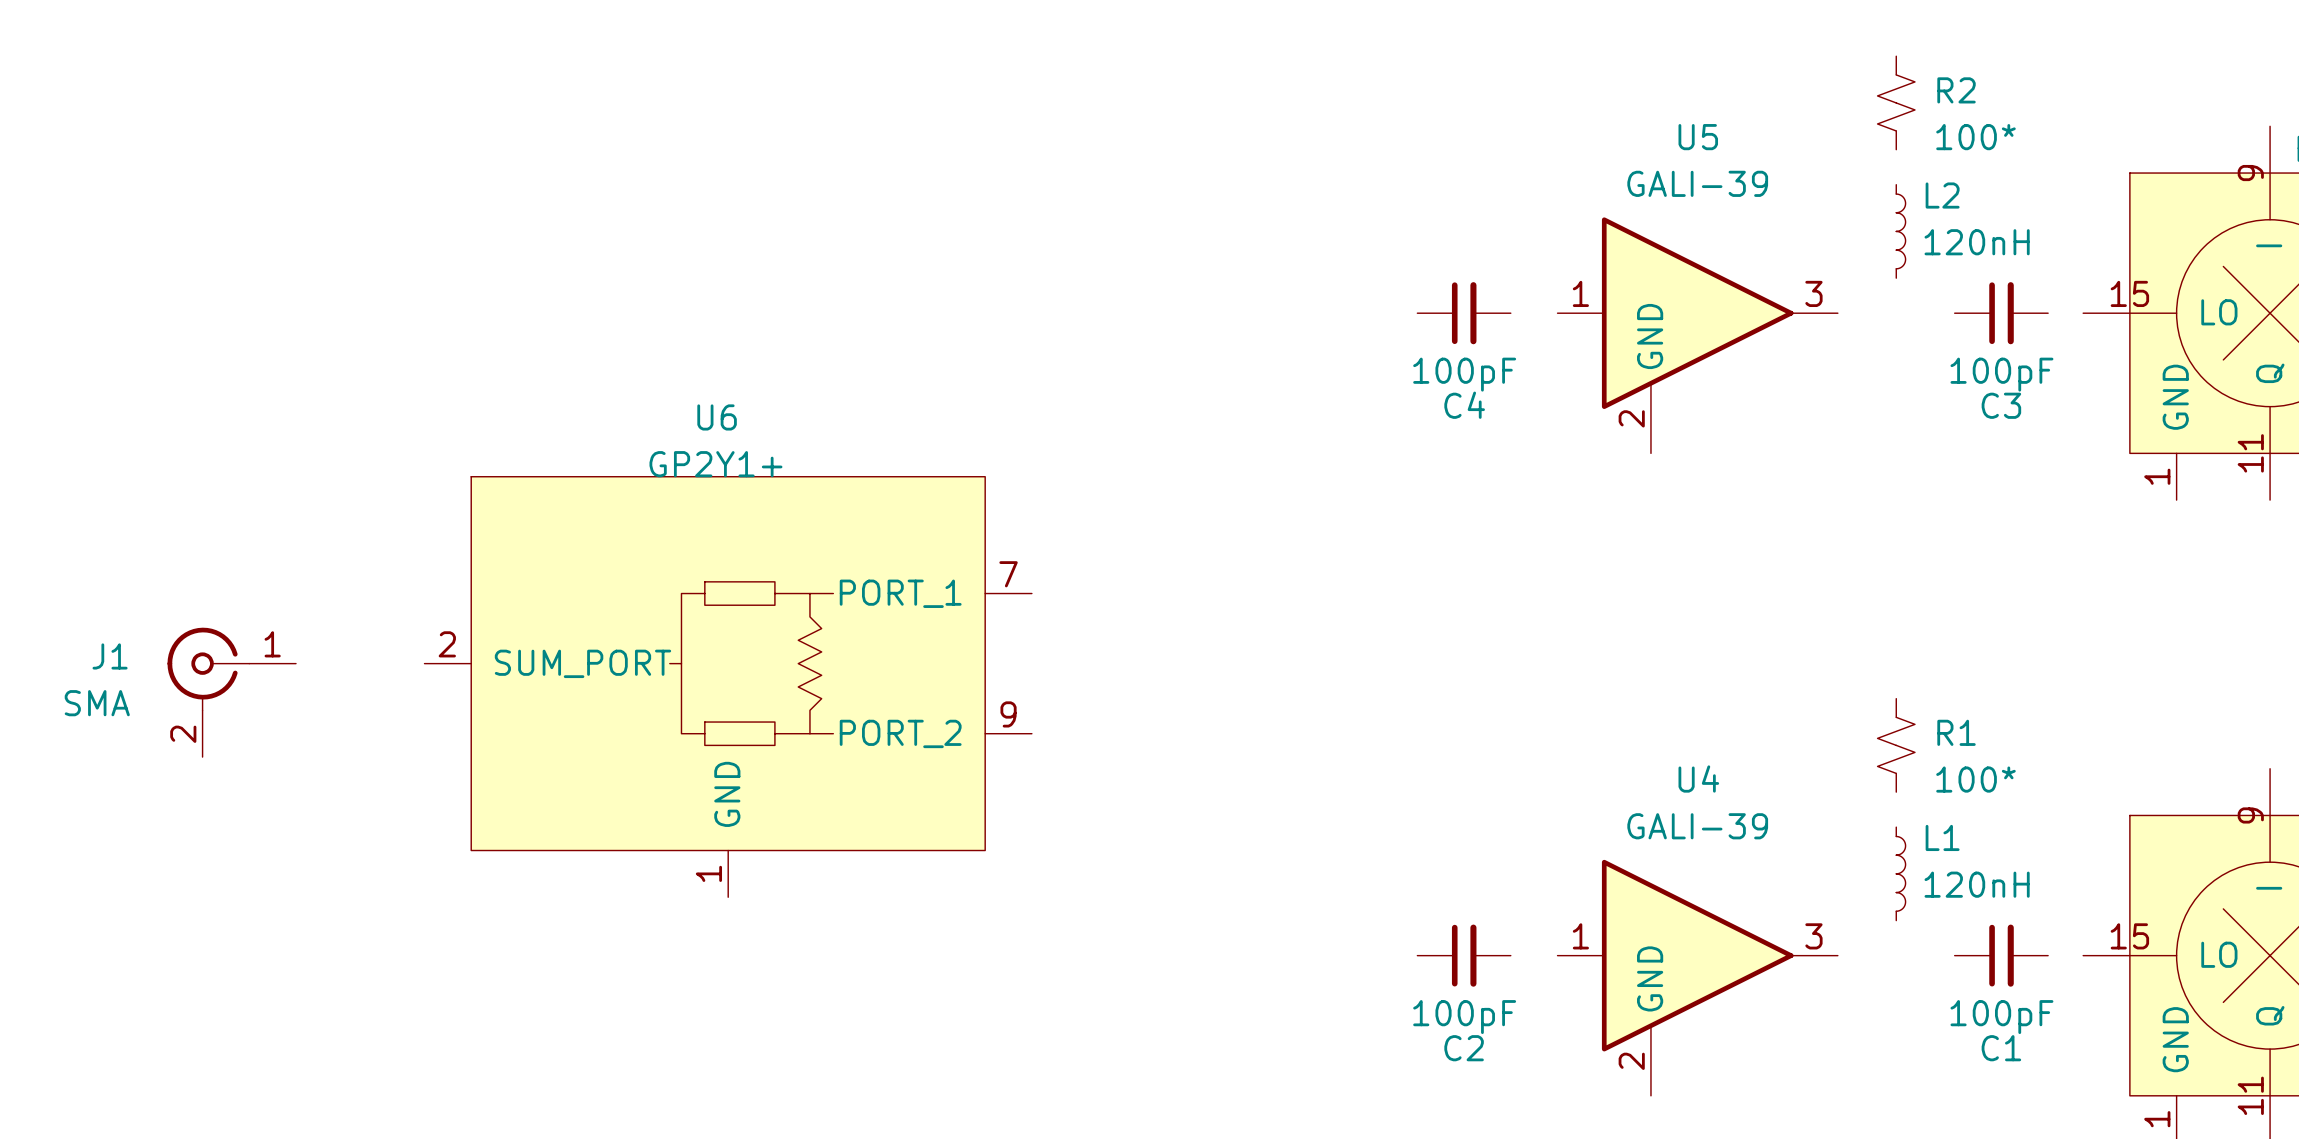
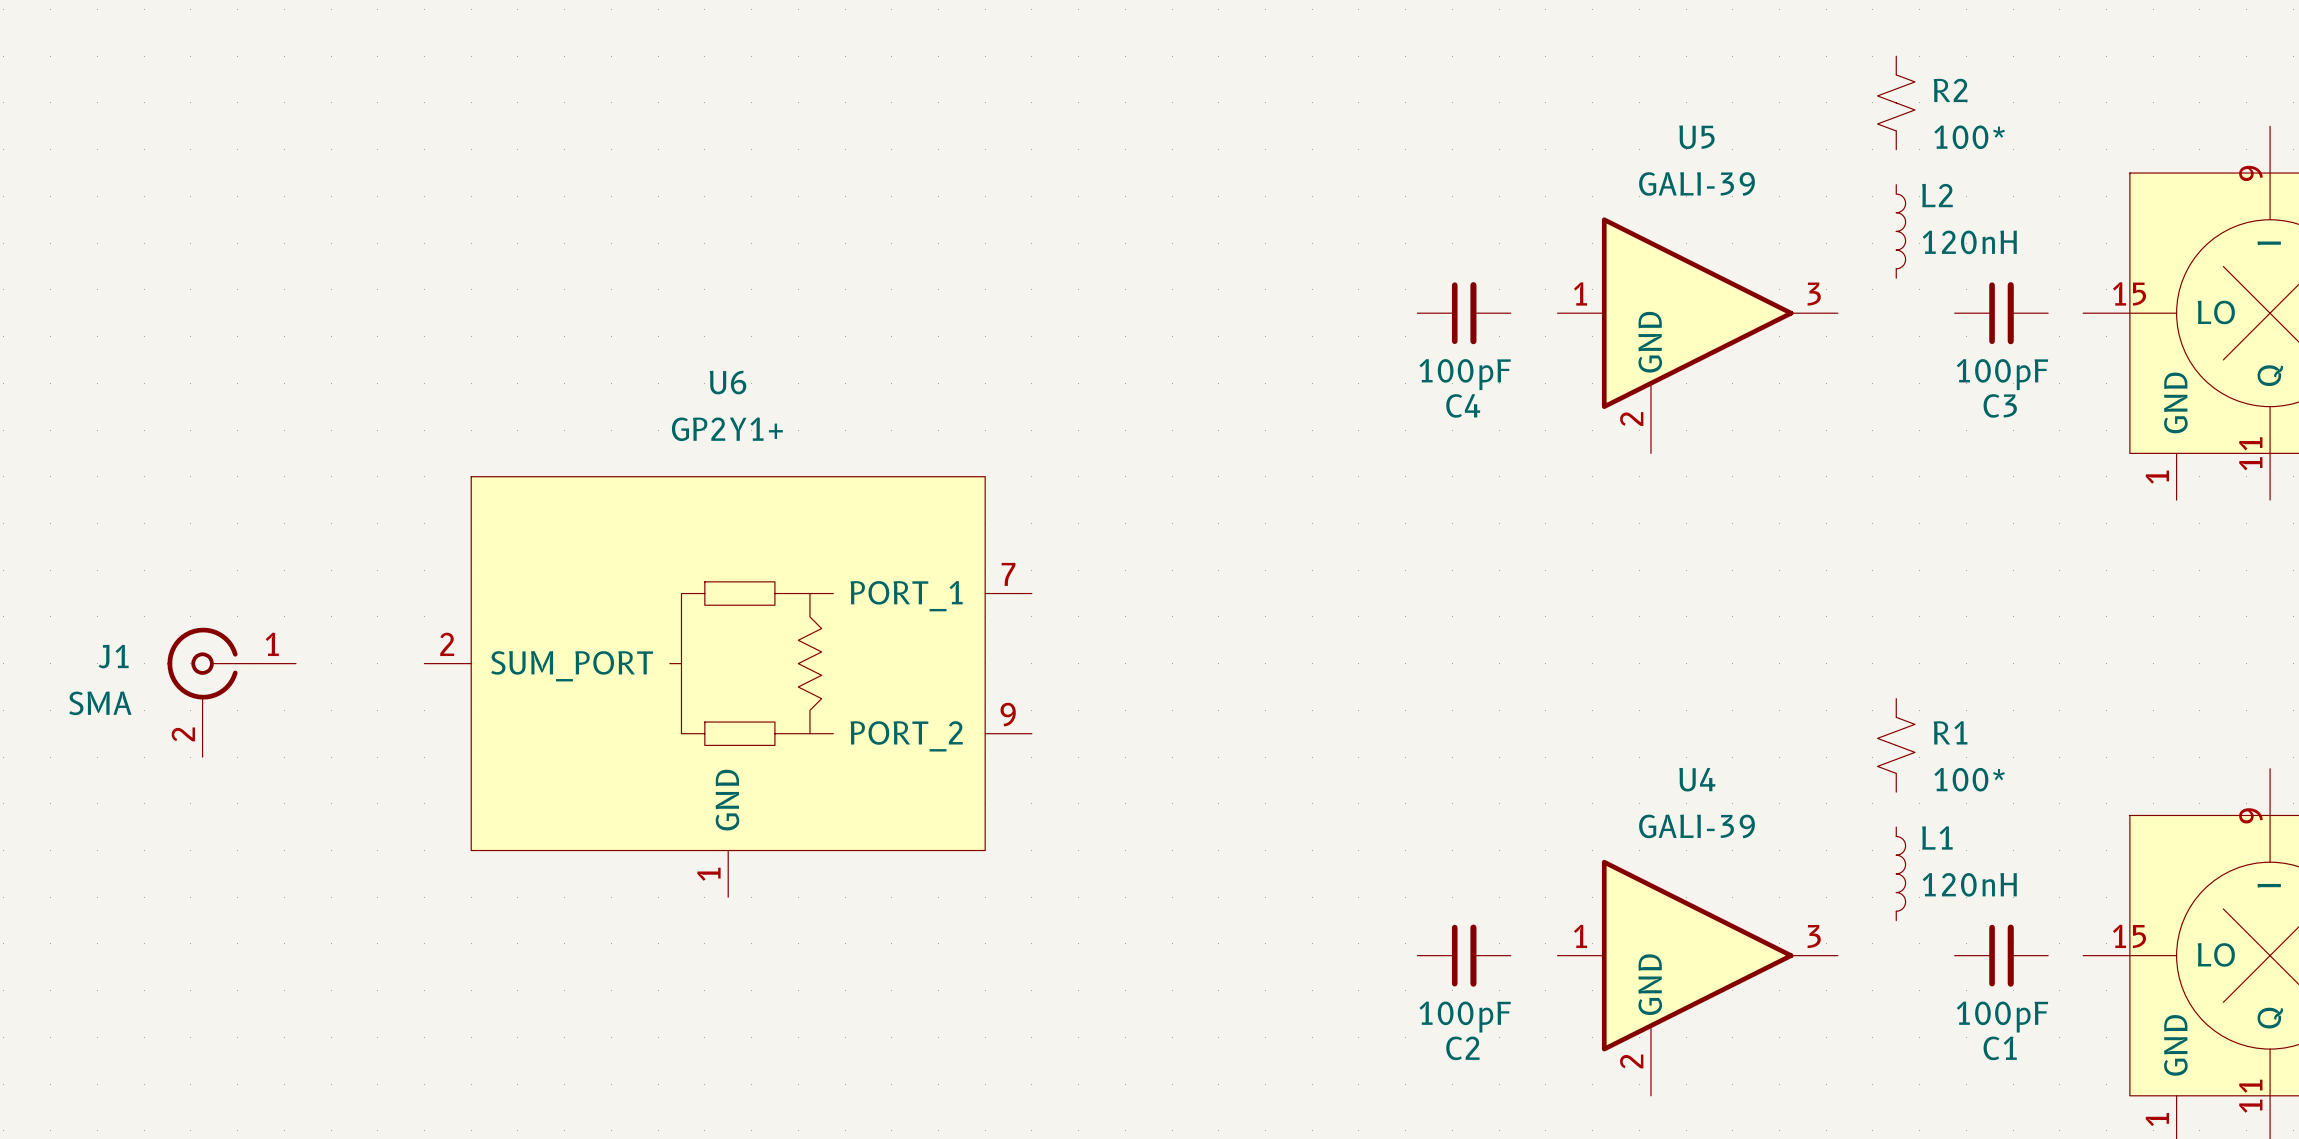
U6 name position: U6 (717, 417) -> U6 (728, 382)
U6 value position: GP2Y1+ (715, 464) -> GP2Y1+ (727, 429)

